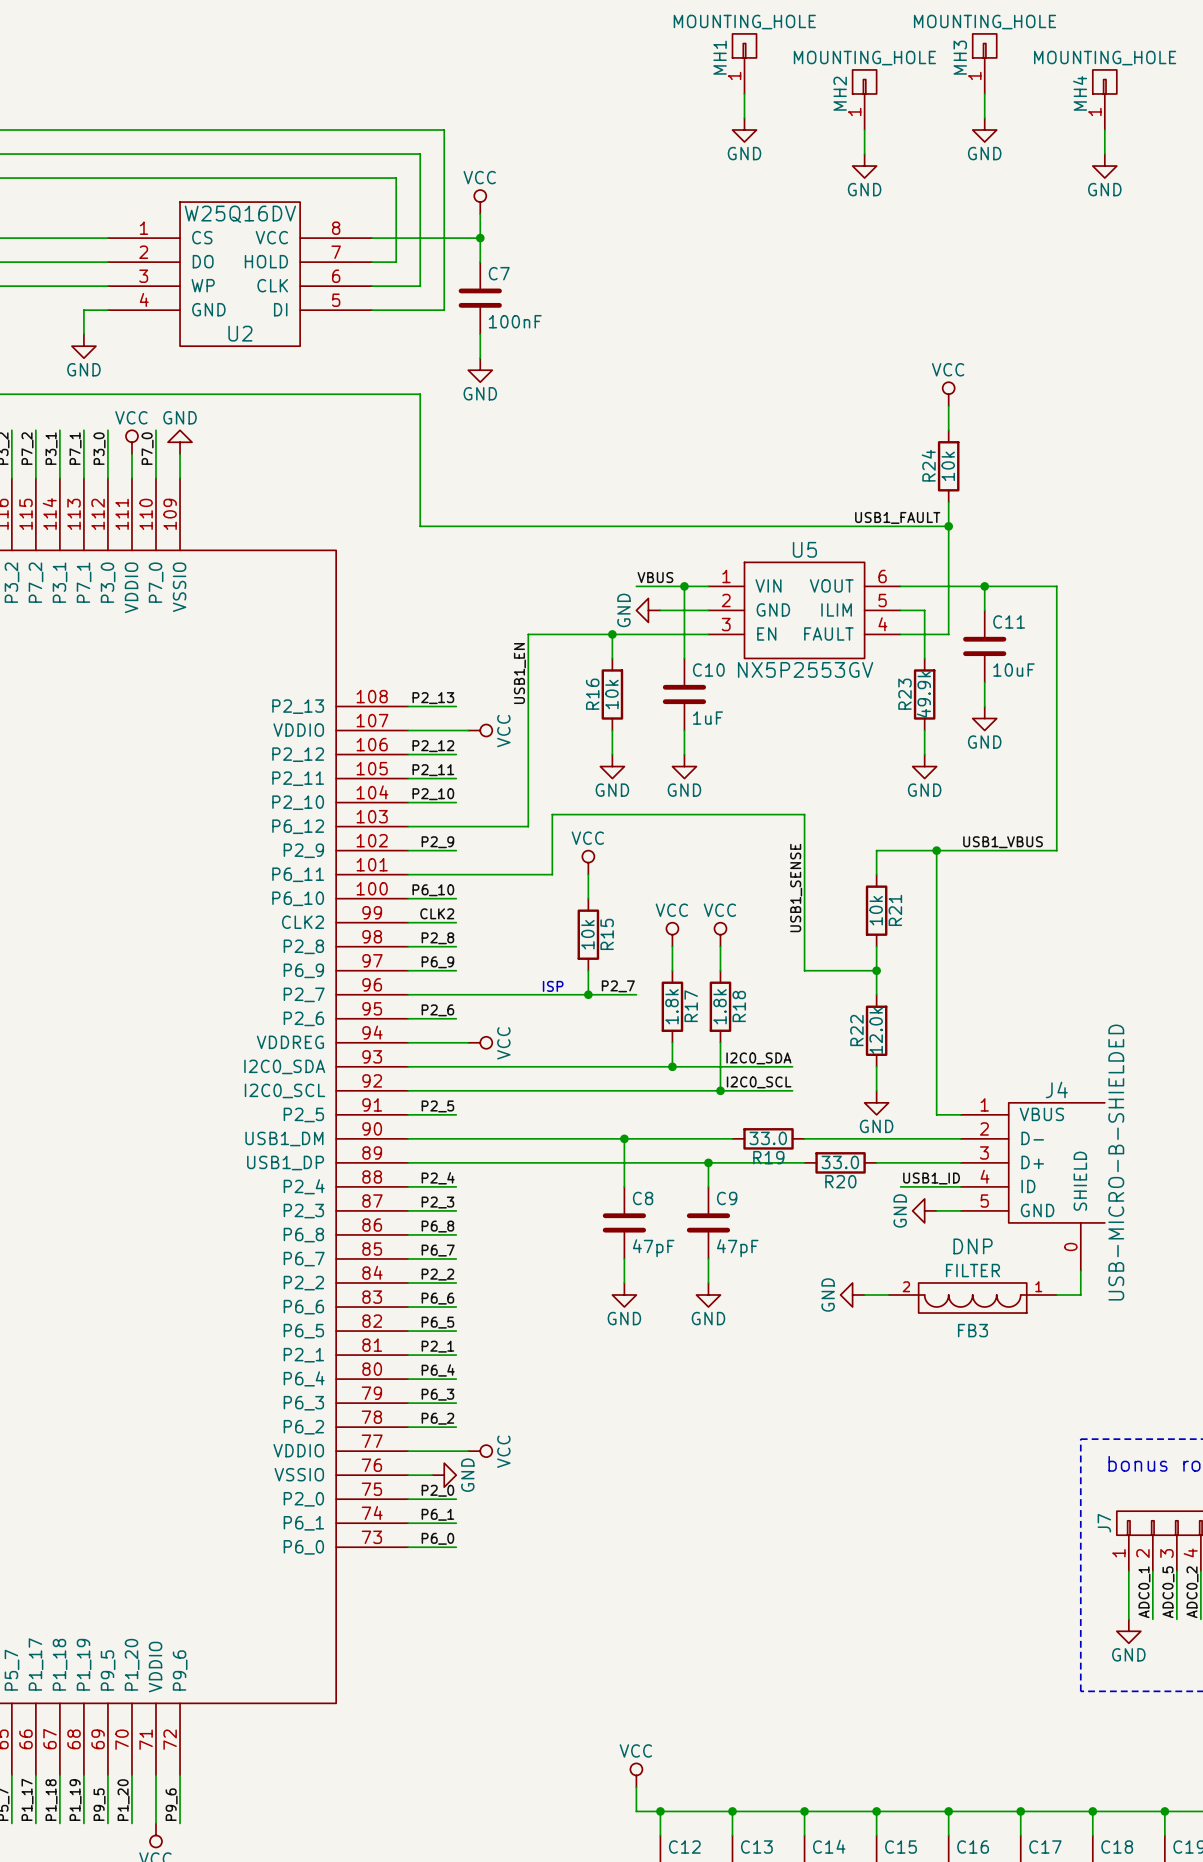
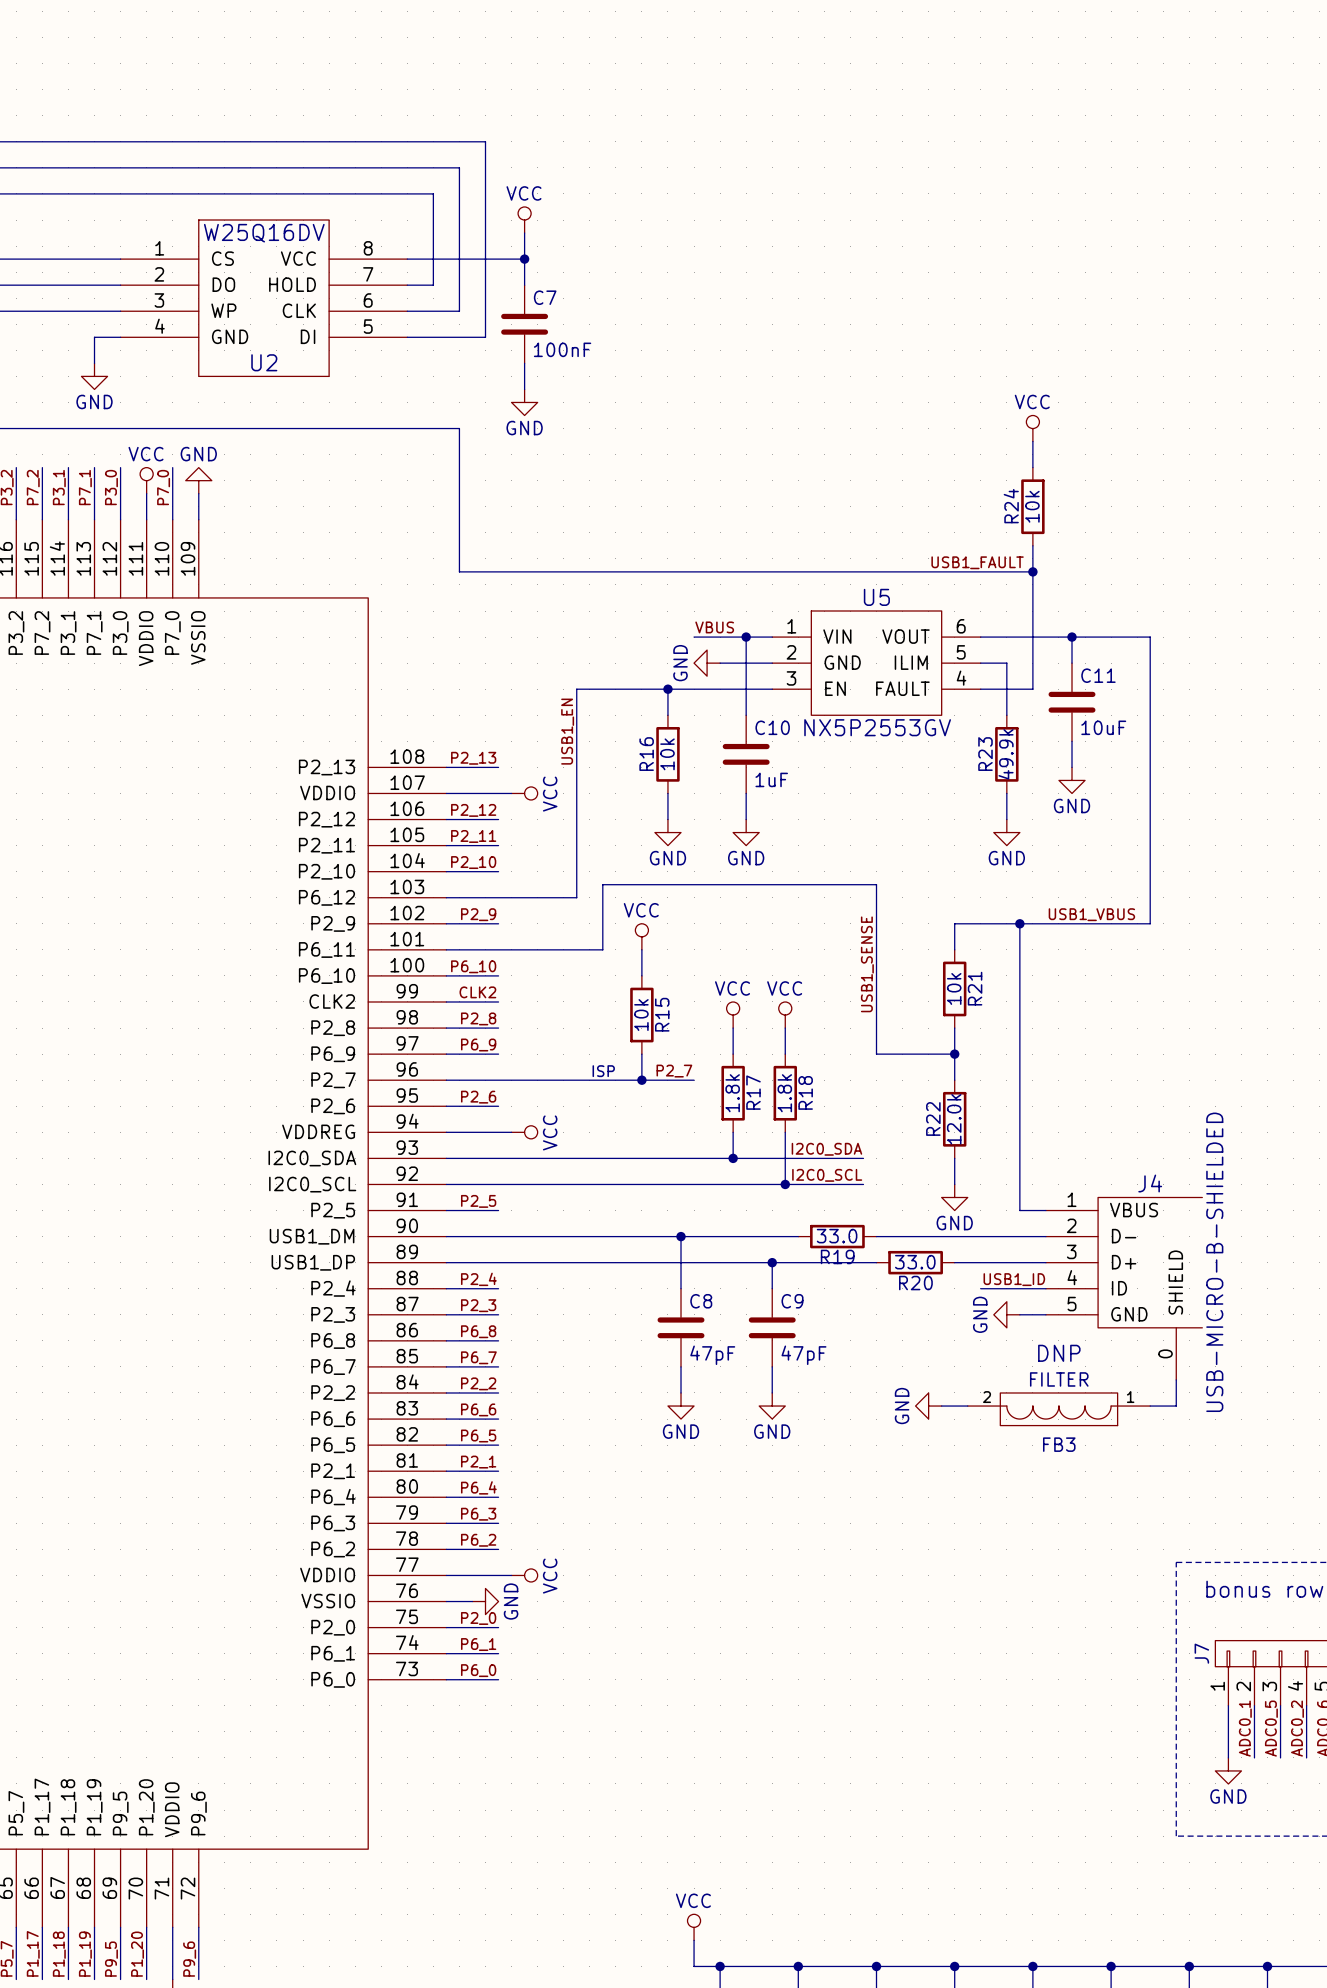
MH1: MOUNTING_HOLE (744, 63) -> none
MH3: MOUNTING_HOLE (984, 63) -> none
wire: (744, 93) (744, 118) -> none
wire: (984, 93) (984, 118) -> none
MH2: MOUNTING_HOLE (864, 99) -> none
MH4: MOUNTING_HOLE (1104, 99) -> none
power symbol: GND (744, 130) -> none
wire: (864, 130) (864, 154) -> none
power symbol: GND (984, 130) -> none
wire: (1104, 130) (1104, 154) -> none
power symbol: GND (864, 166) -> none
power symbol: GND (1104, 166) -> none

